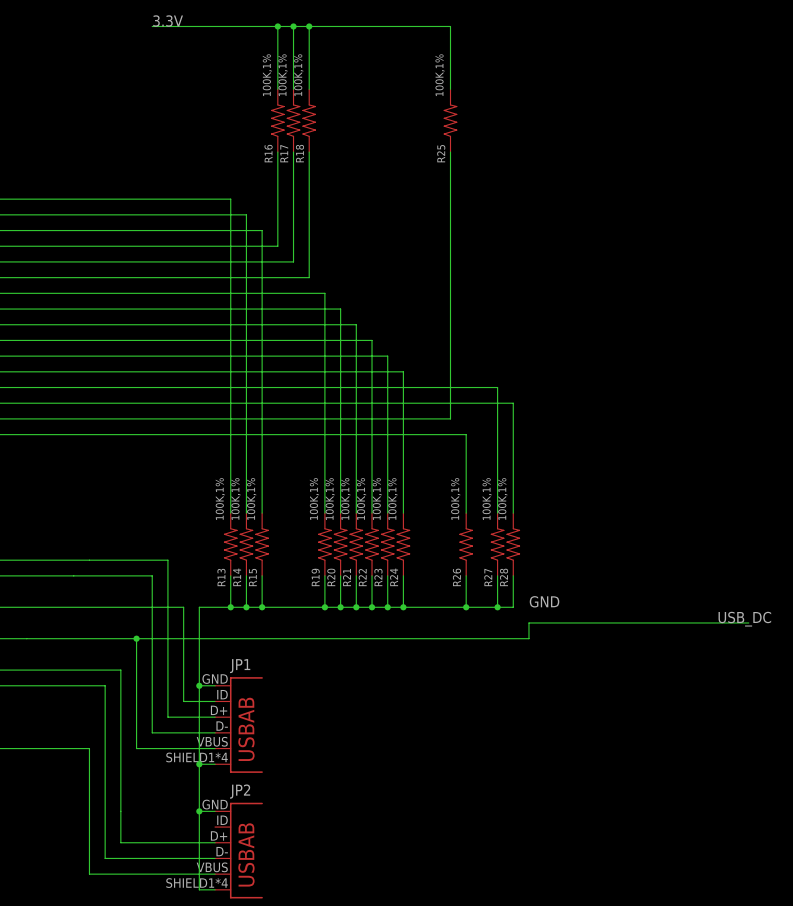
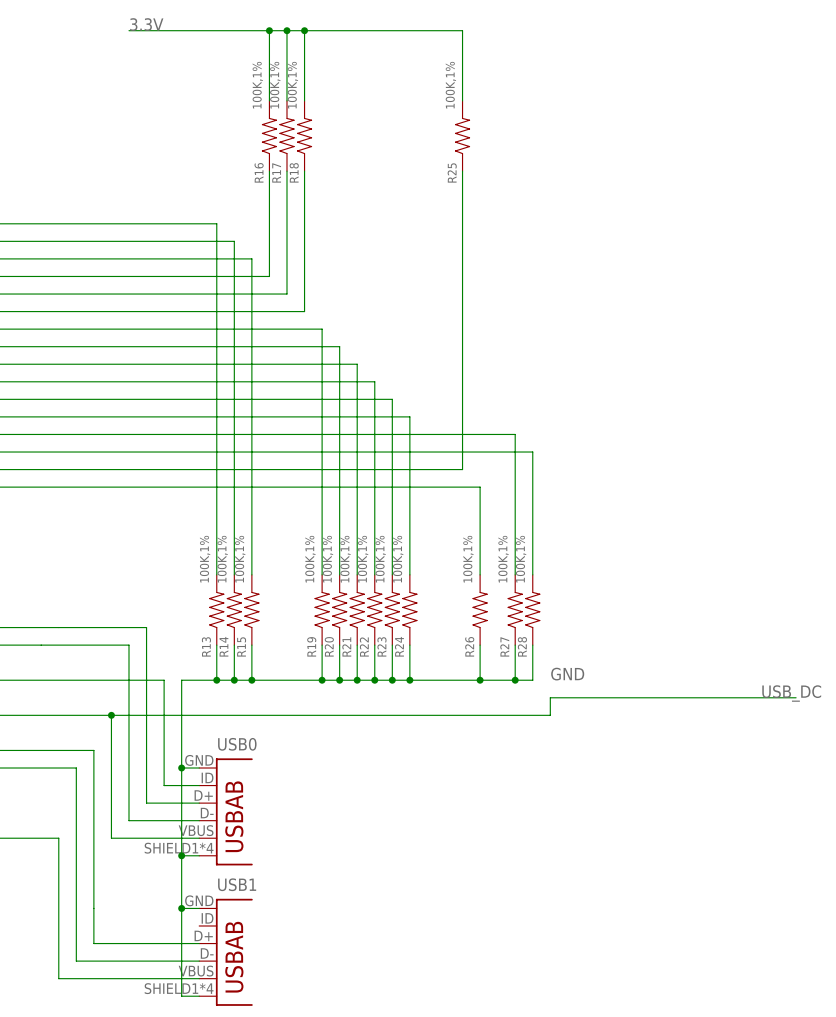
JP1 name: JP1 (240, 666) -> USB0 (237, 744)
JP2 name: JP2 (240, 791) -> USB1 (237, 884)

